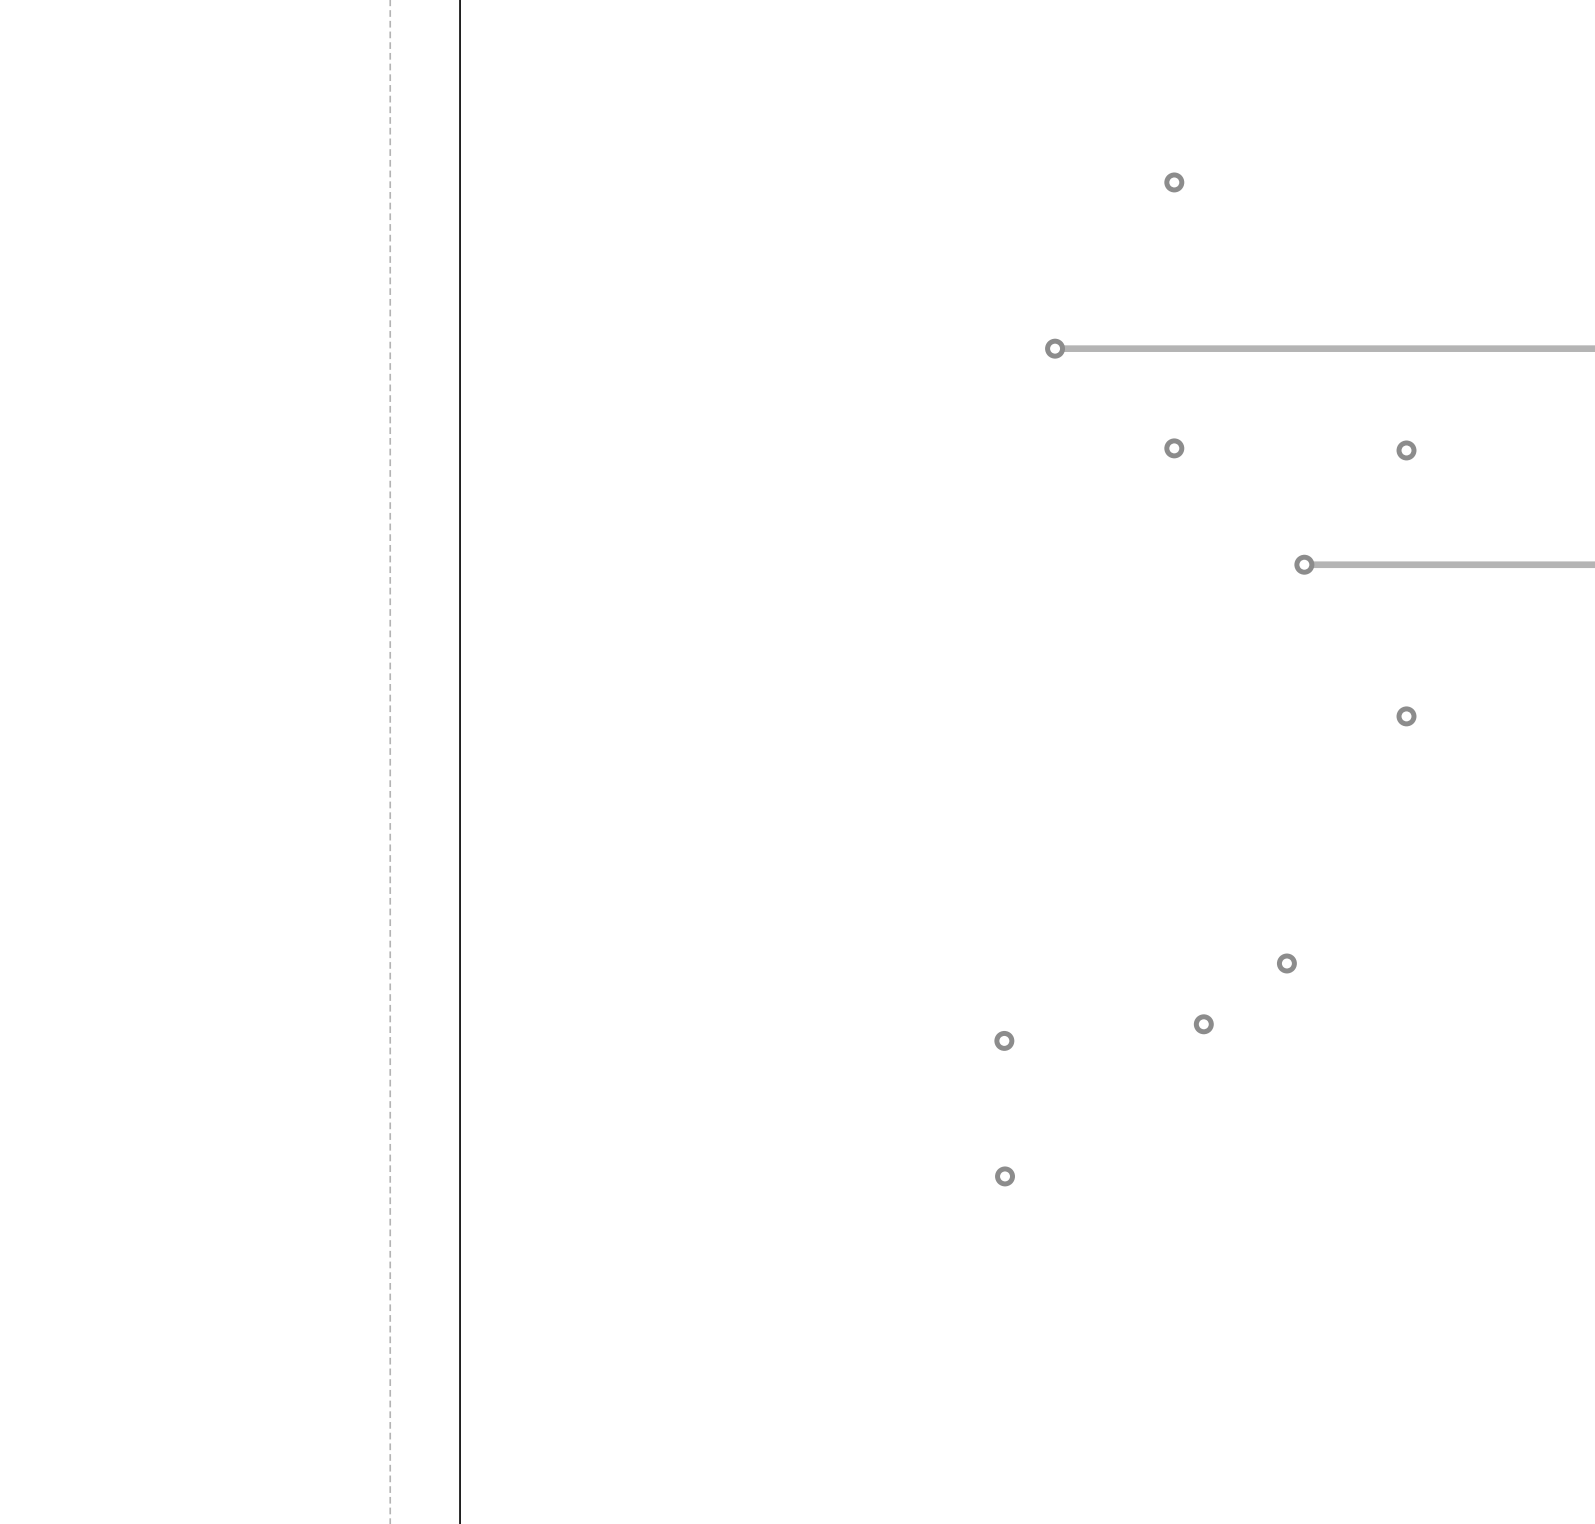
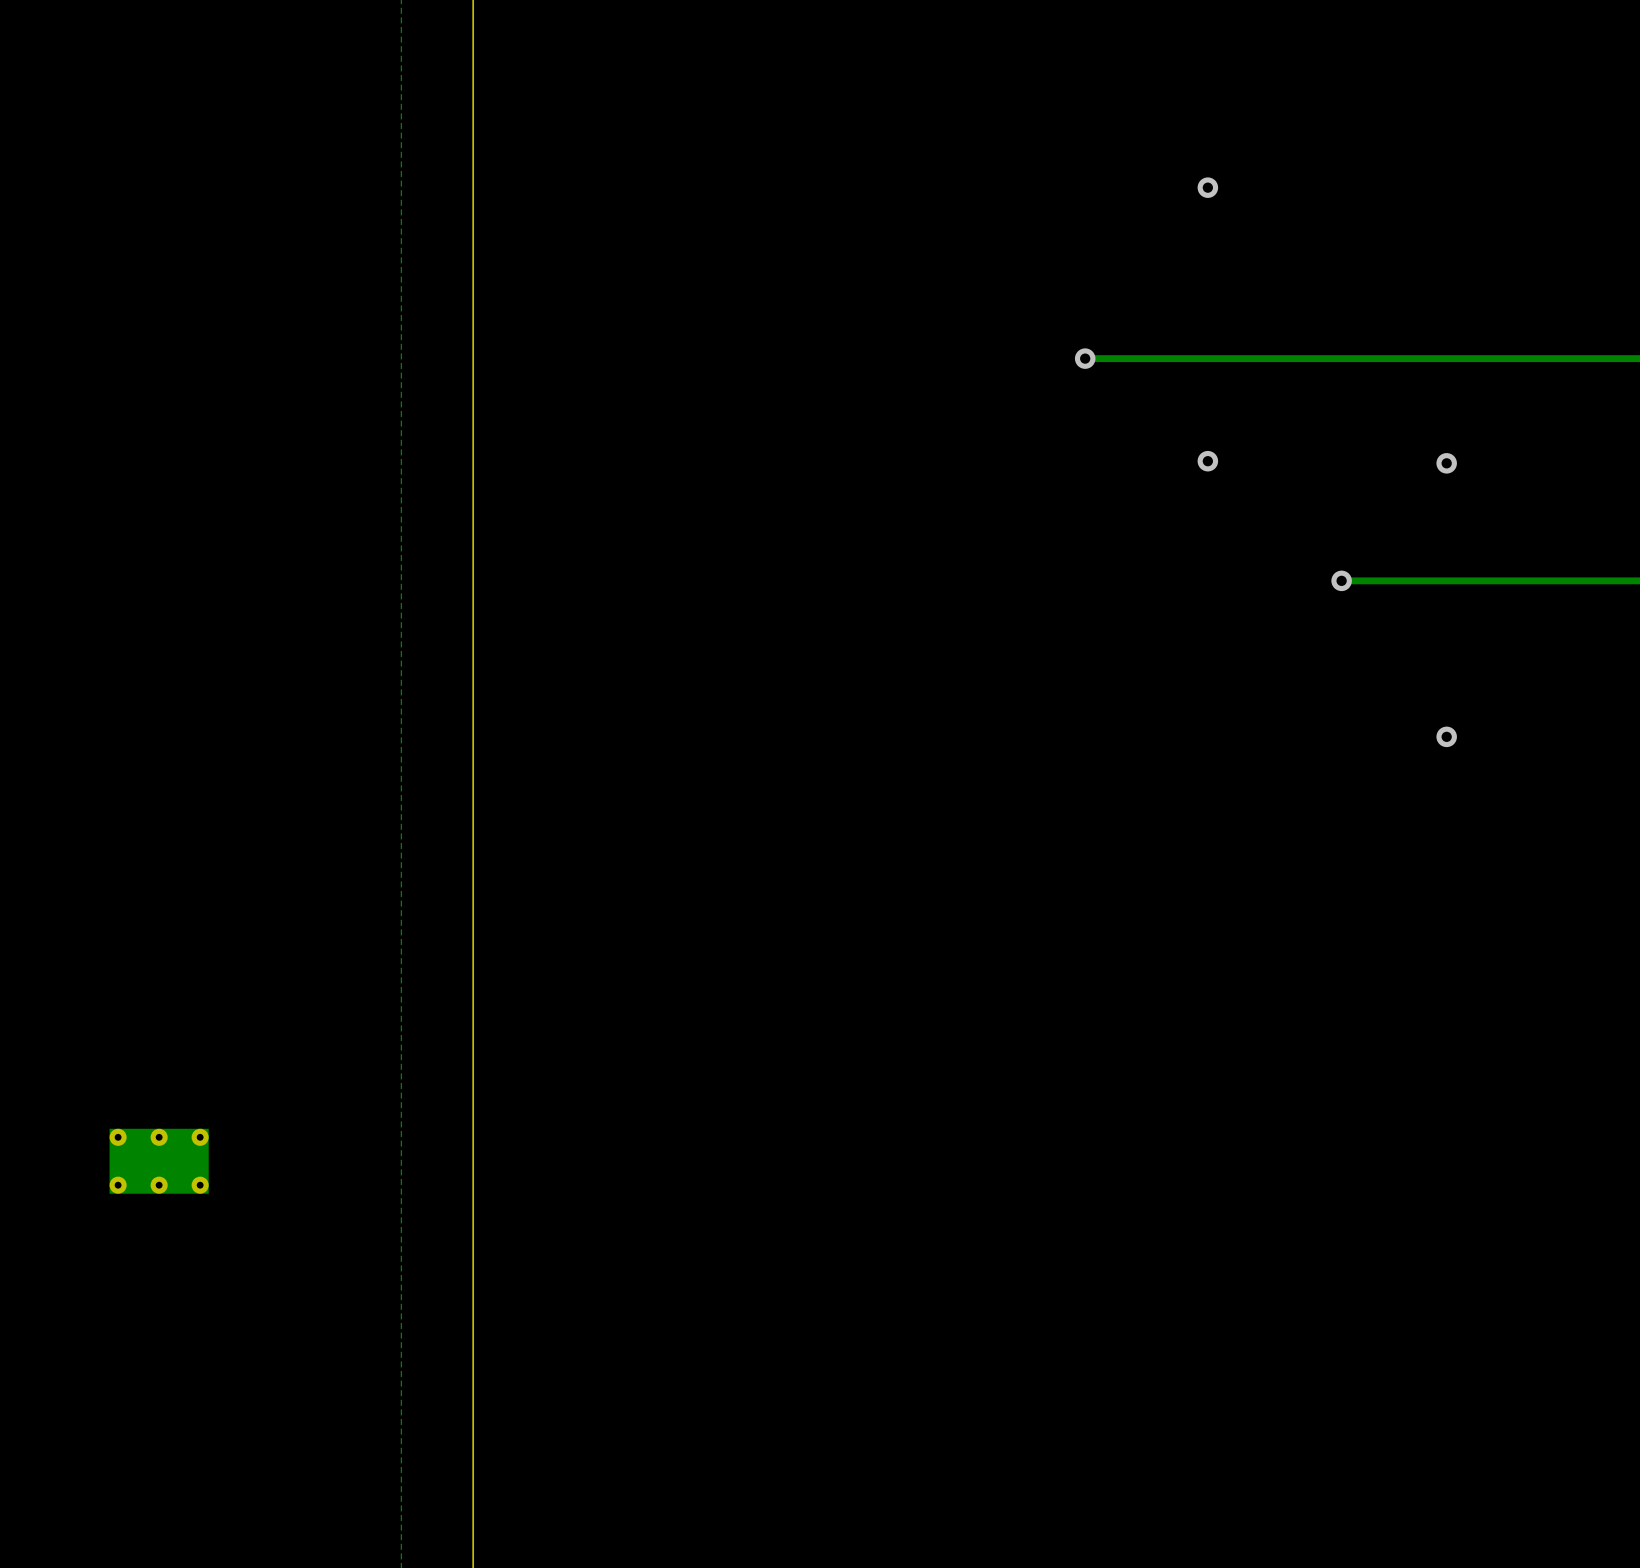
via: (1286, 963) -> none
via: (1203, 1024) -> none
via: (1004, 1040) -> none
part: none -> (159, 1161)
via: (1005, 1176) -> none

